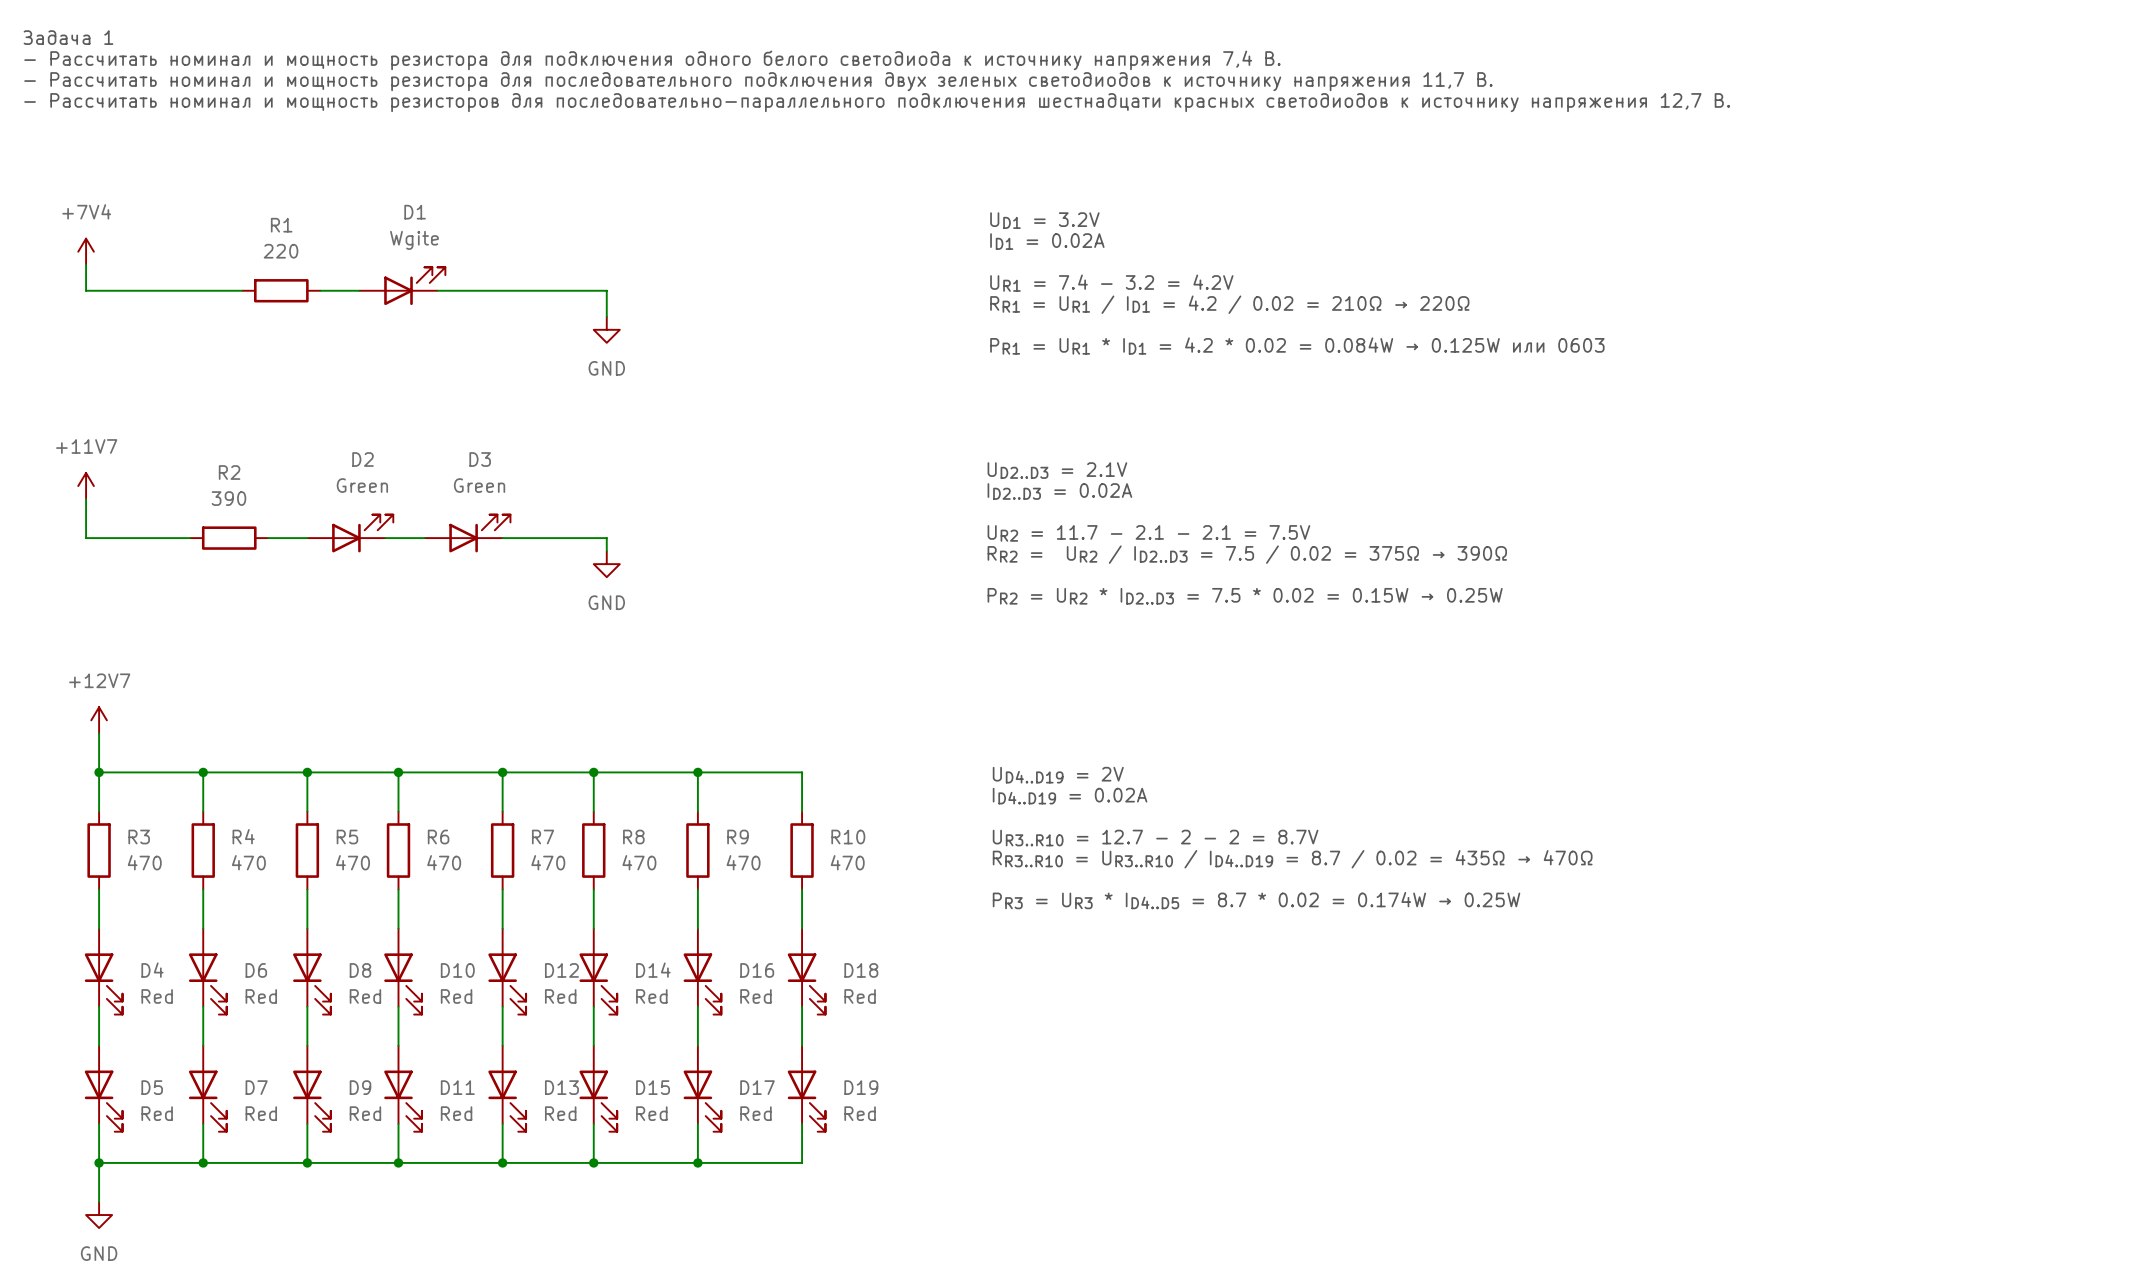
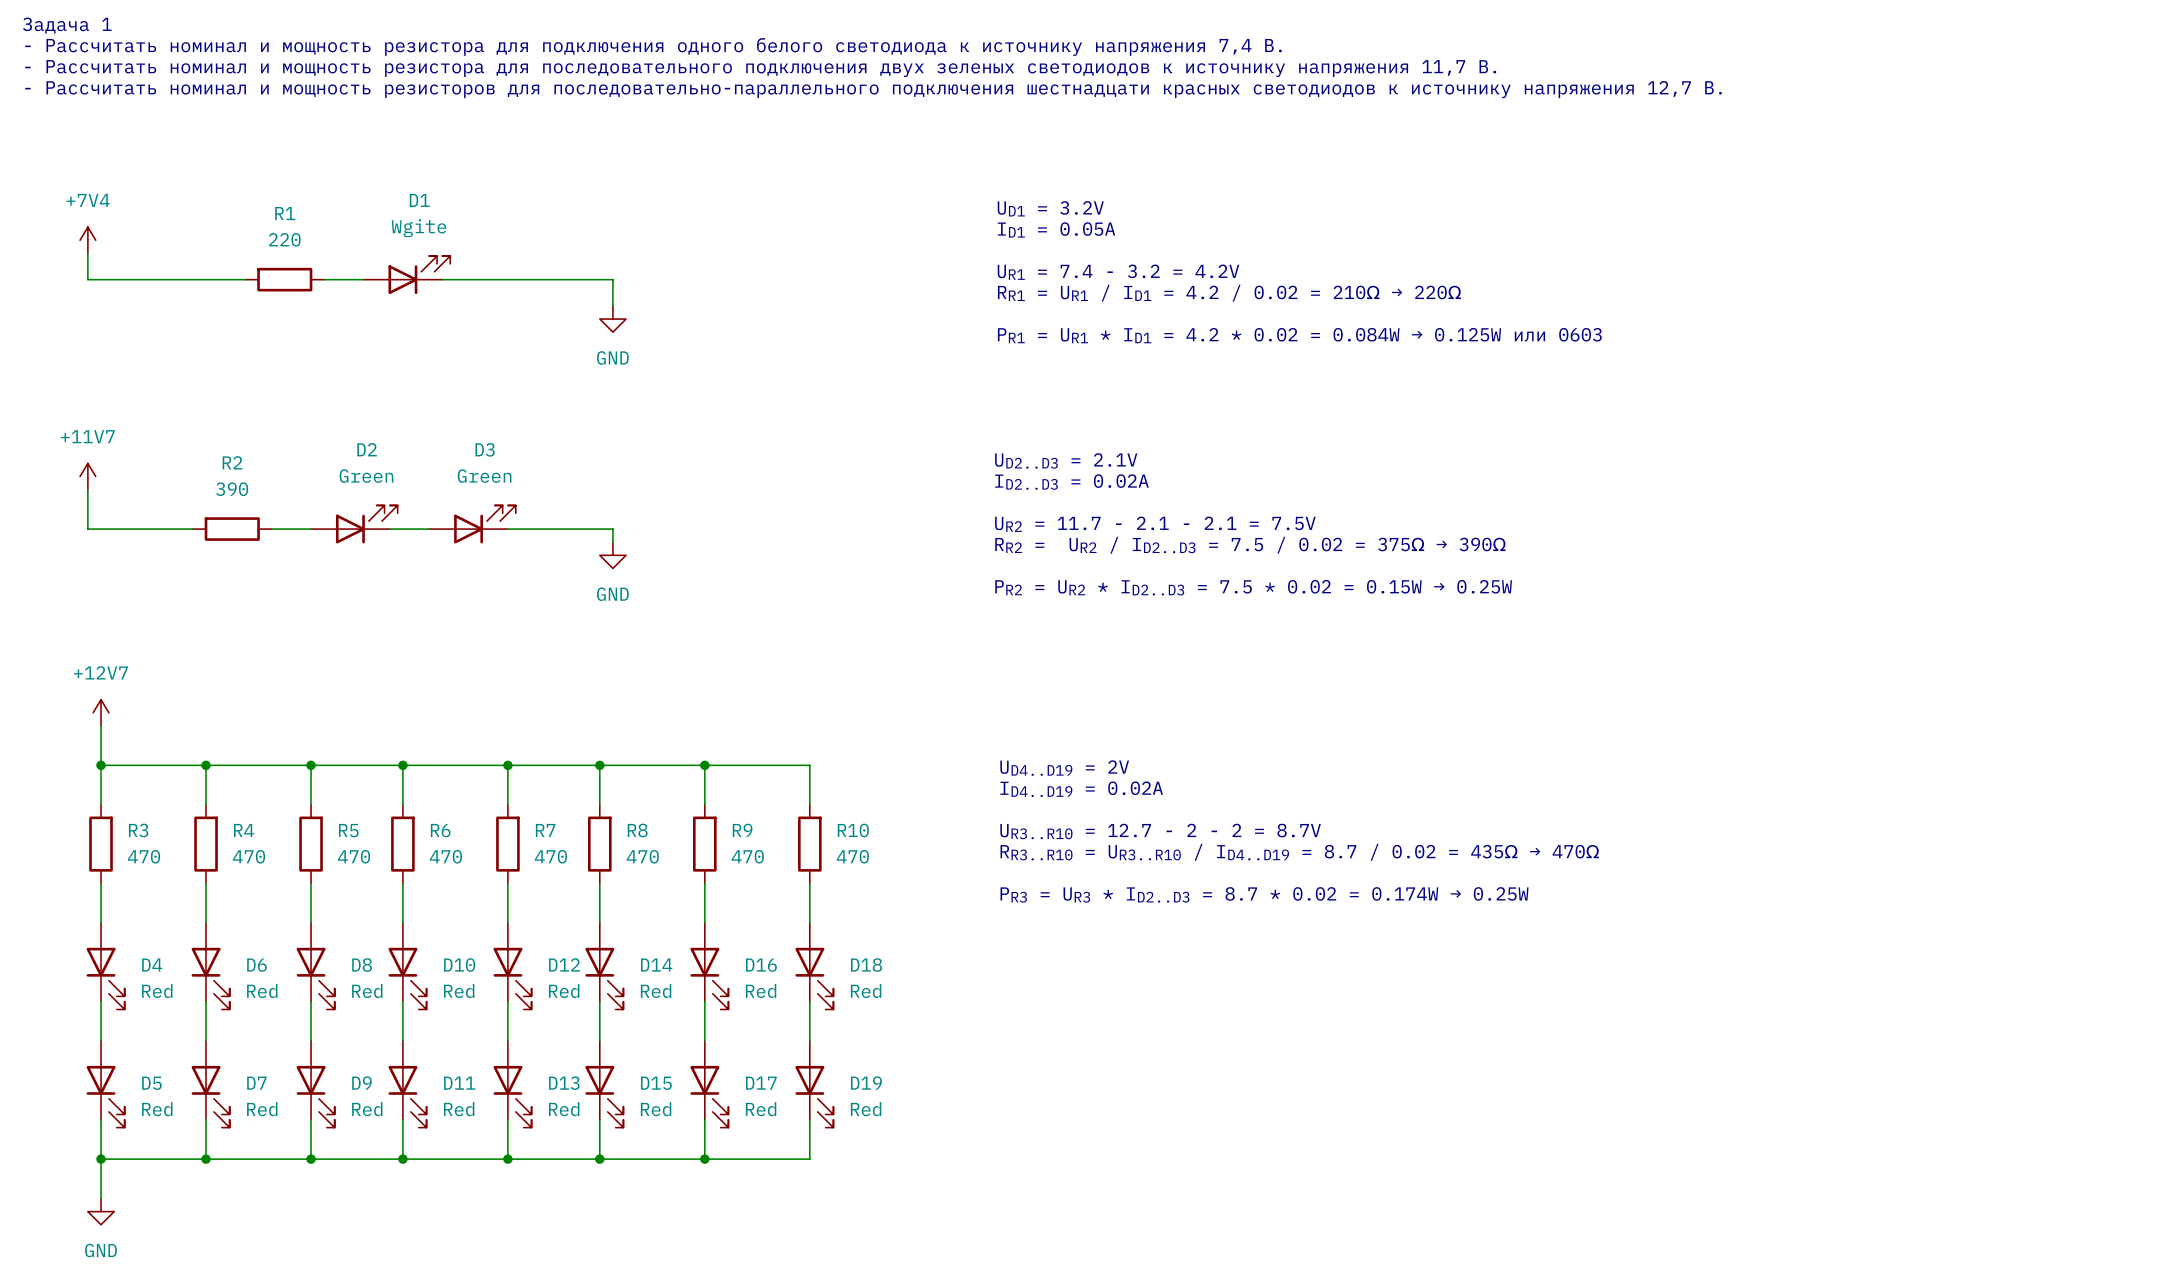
text: ID1 = 0.02A (1047, 241) -> ID1 = 0.05A (1056, 229)
text: PR3 = UR3 * ID4..D5 = 8.7 * 0.02 = 0.174W → 0.25W (1256, 900) -> PR3 = UR3 * ID2..D3 = 8.7 * 0.02 = 0.174W → 0.25W (1264, 894)

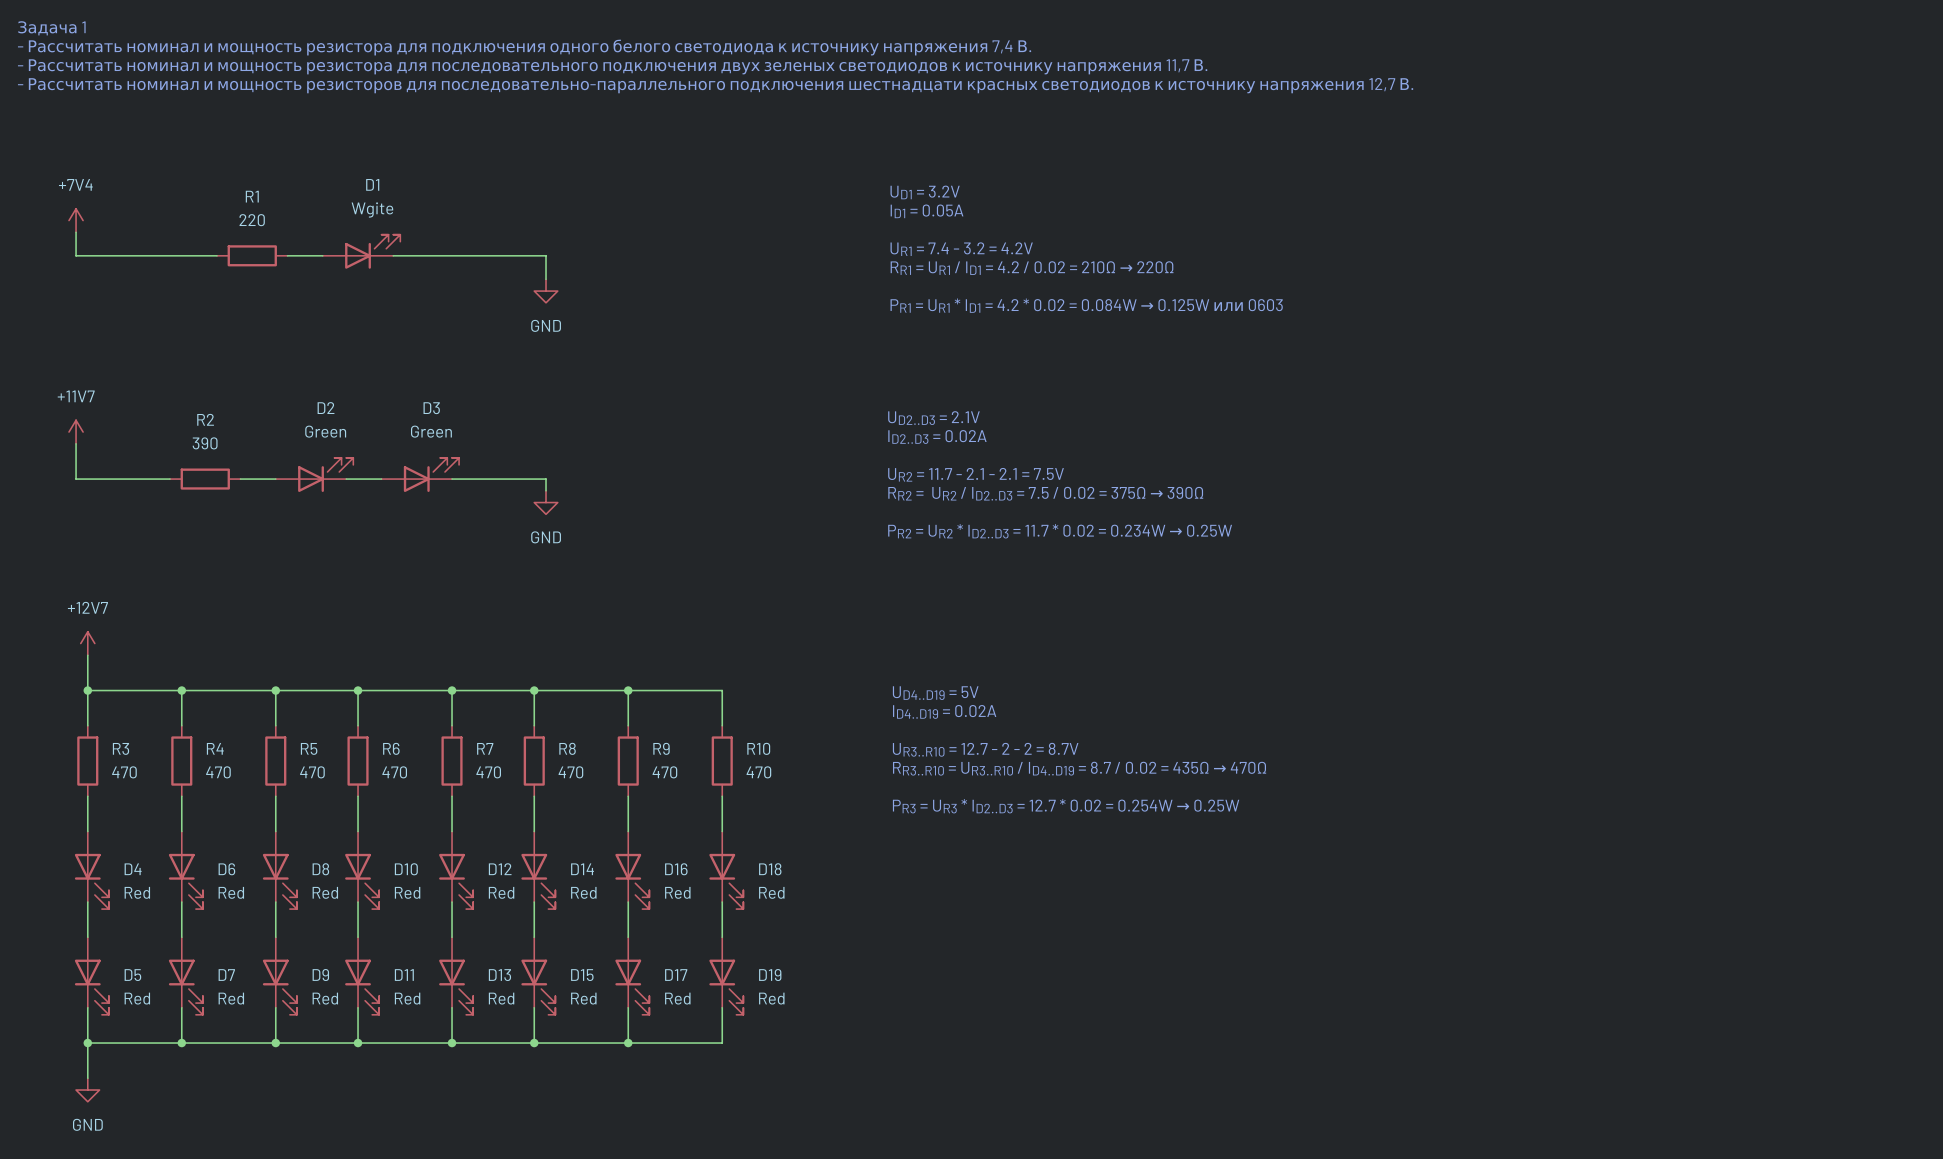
text: PR2 = UR2 * ID2..D3 = 7.5 * 0.02 = 0.15W → 0.25W (1253, 587) -> PR2 = UR2 * ID2..D3 = 11.7 * 0.02 = 0.234W → 0.25W (1060, 531)
text: UD4..D19 = 2V (1064, 768) -> UD4..D19 = 5V (935, 693)
text: PR3 = UR3 * ID2..D3 = 8.7 * 0.02 = 0.174W → 0.25W (1264, 894) -> PR3 = UR3 * ID2..D3 = 12.7 * 0.02 = 0.254W → 0.25W (1066, 806)

